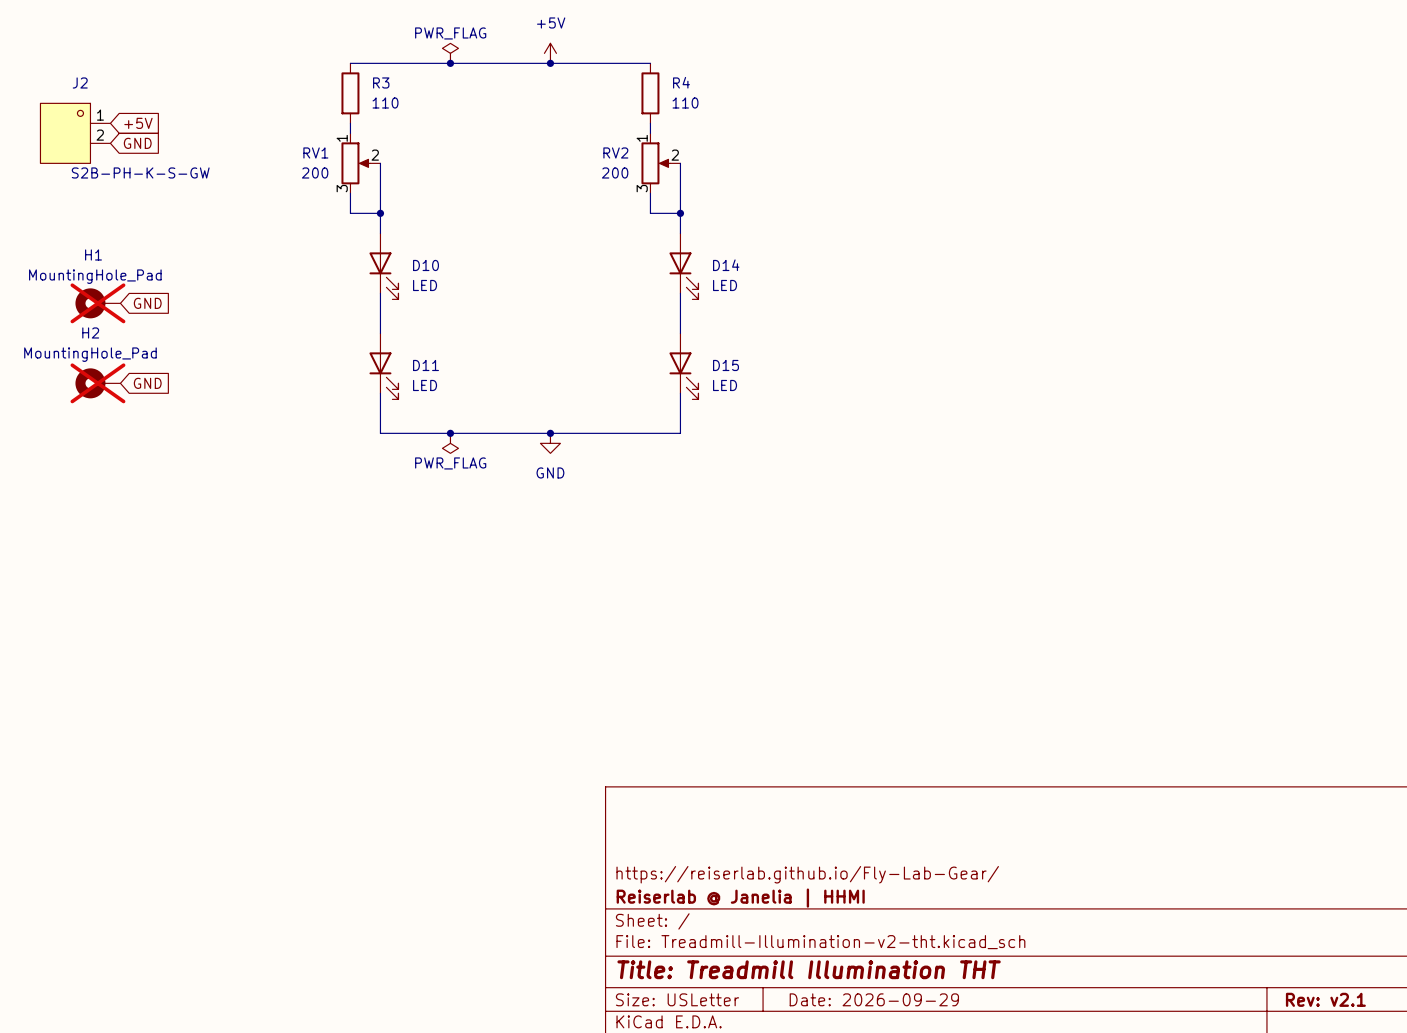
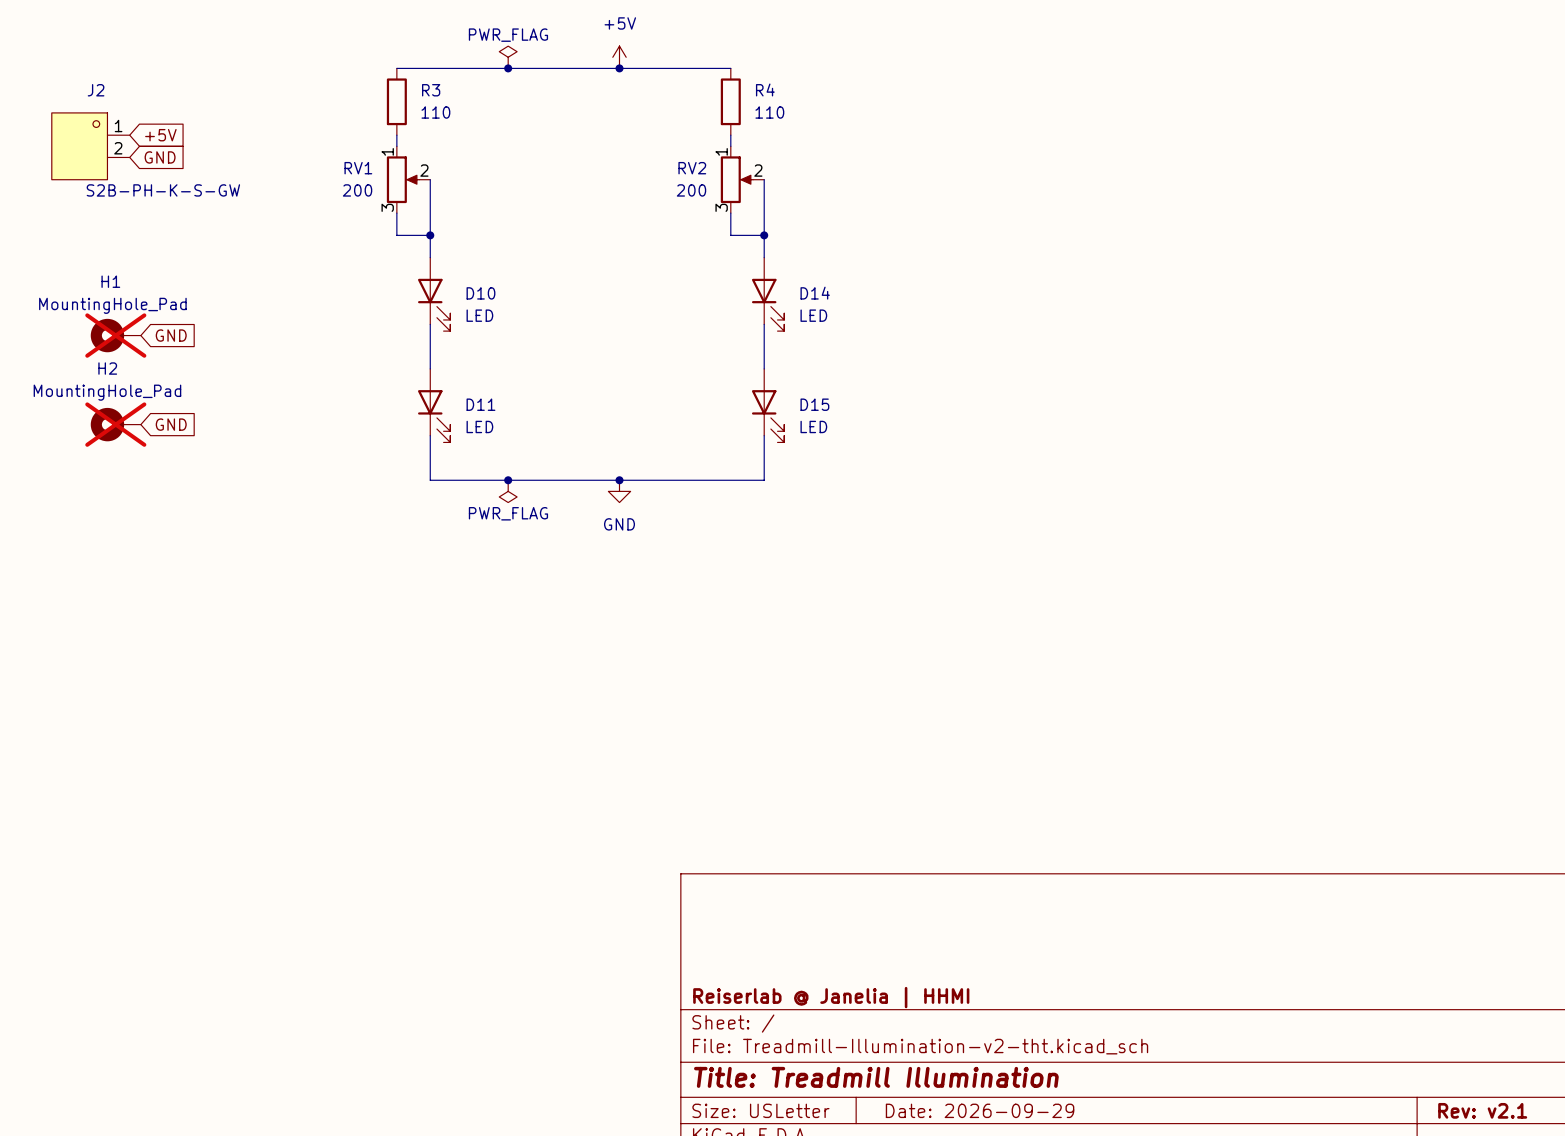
title block: https://reiserlab.github.io/Fly-Lab-Gear/ (807, 874) -> none
title block: Title: Treadmill Illumination THT (809, 969) -> Title: Treadmill Illumination (876, 1077)

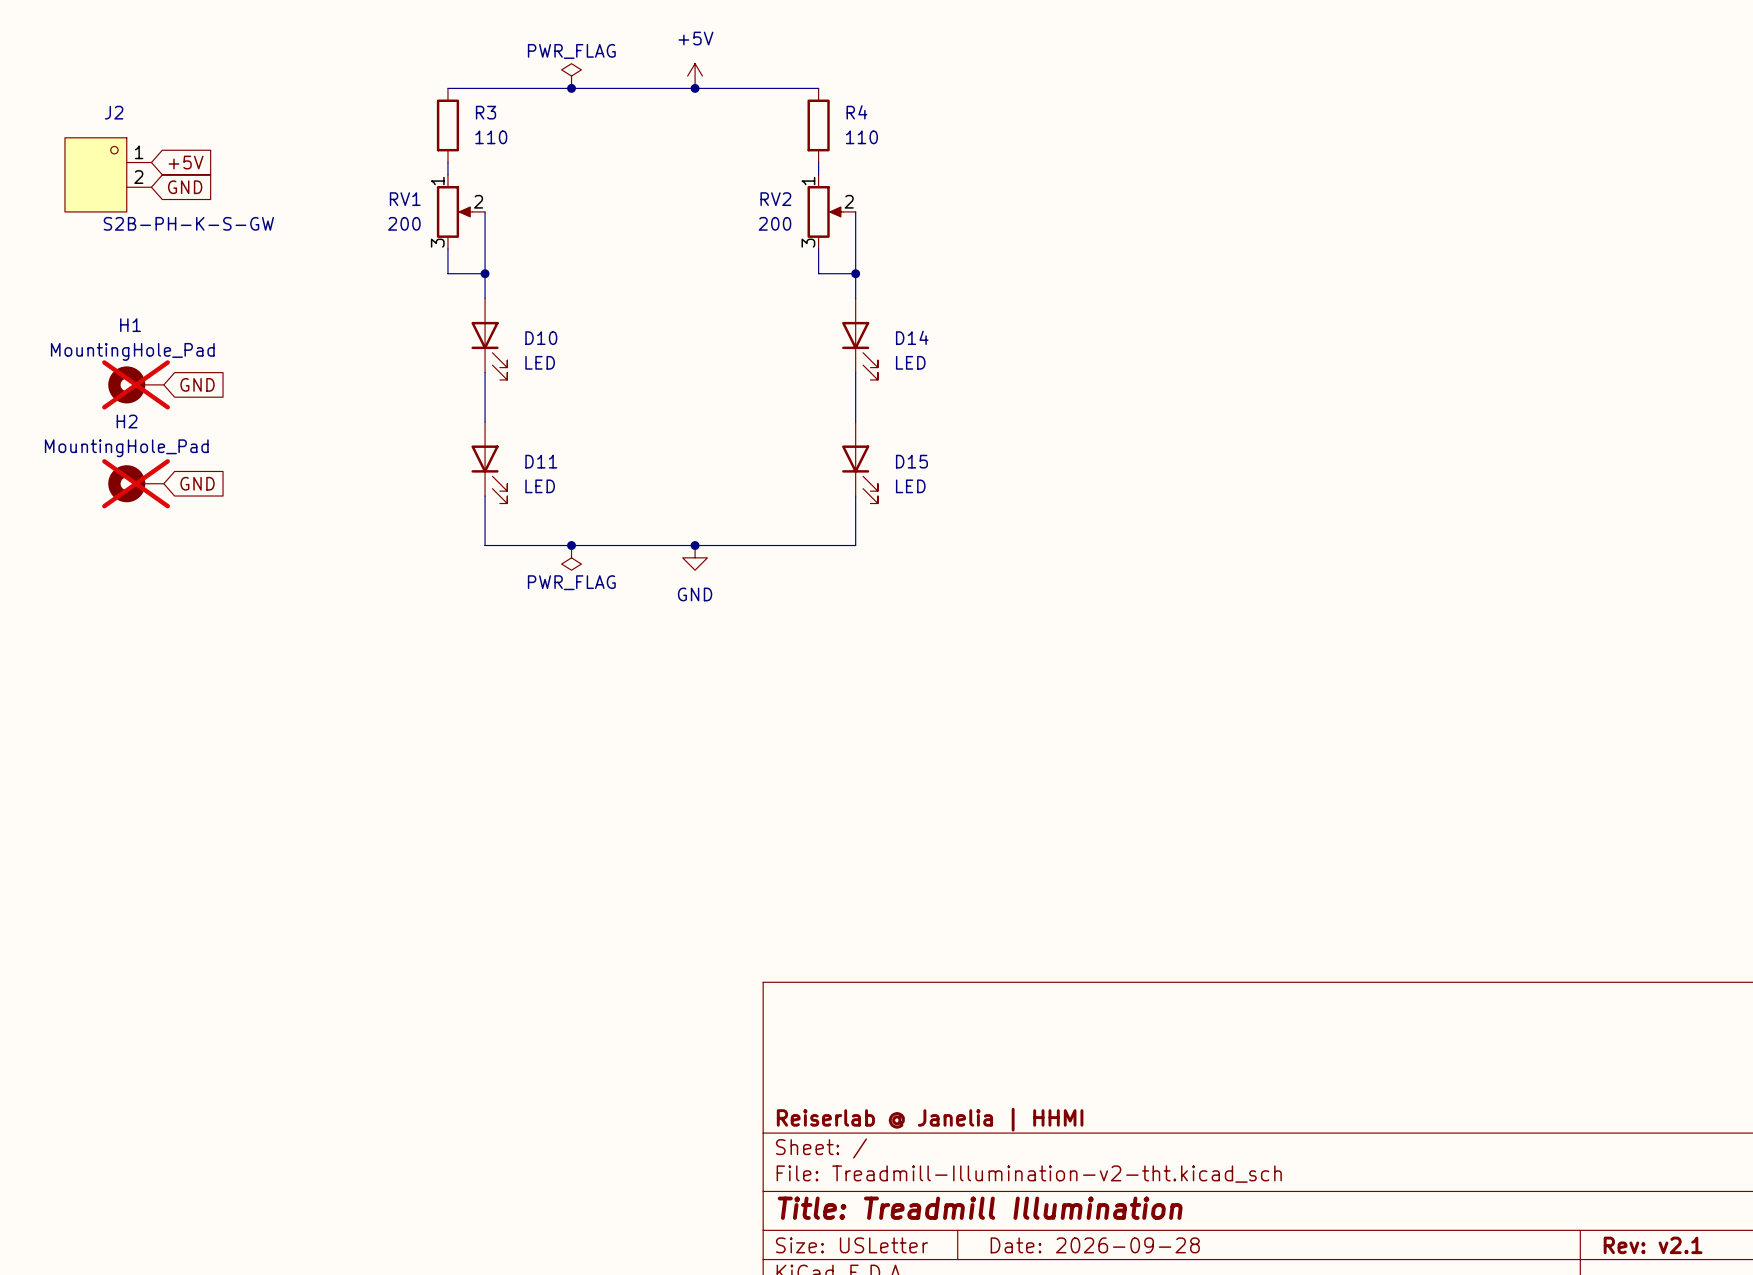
title block: Date: 2026-09-29 (980, 1110) -> Date: 2026-09-28 (1095, 1245)

